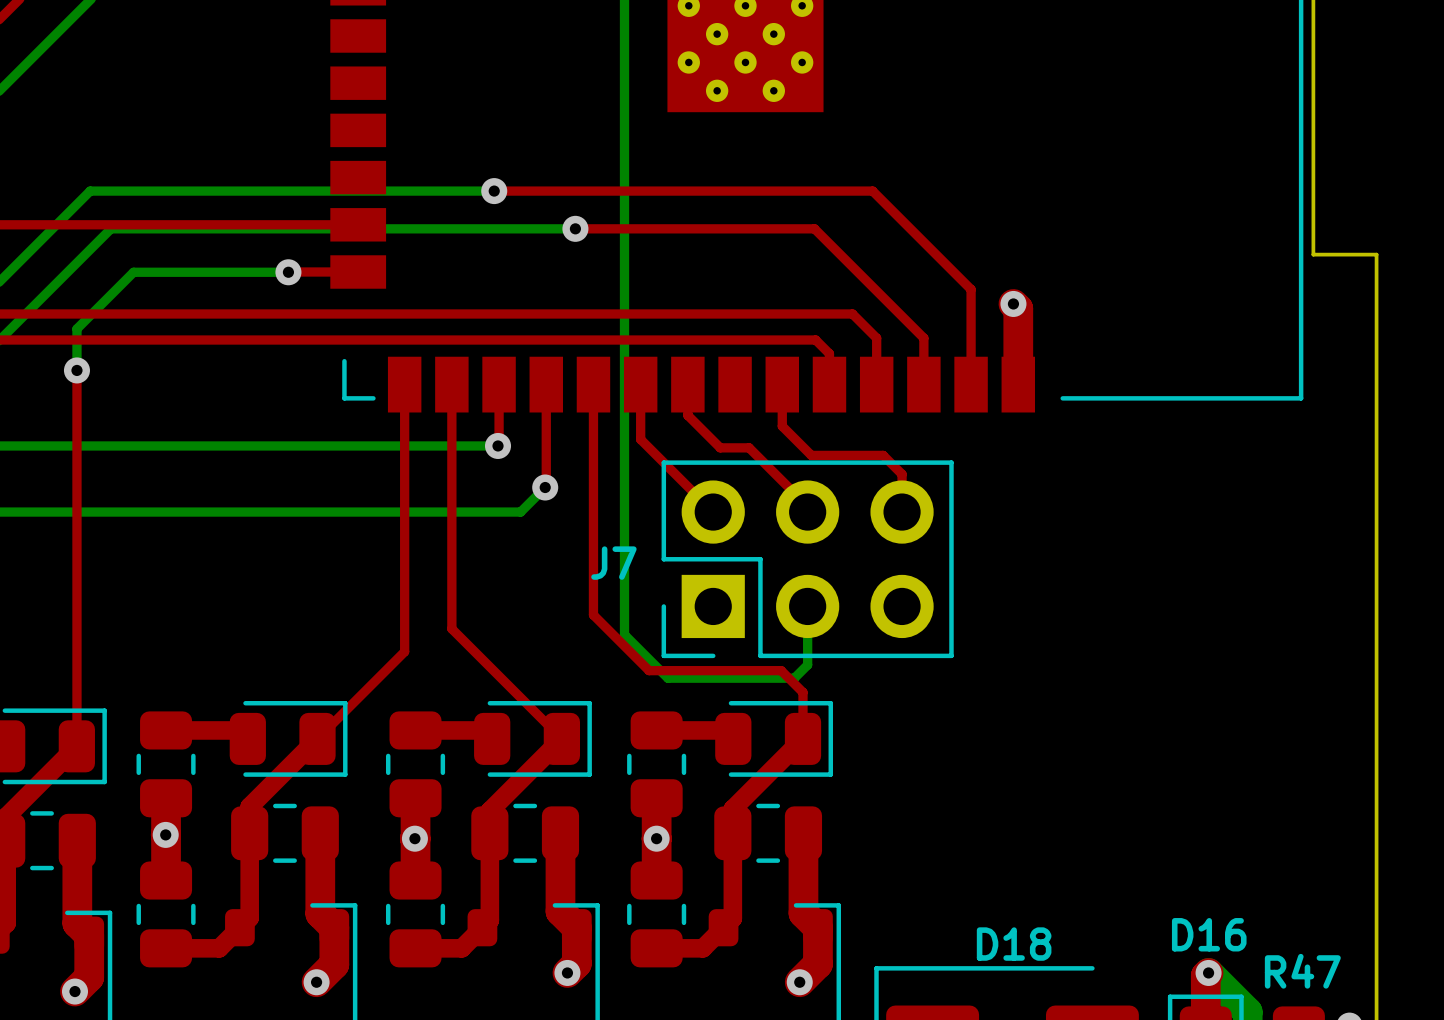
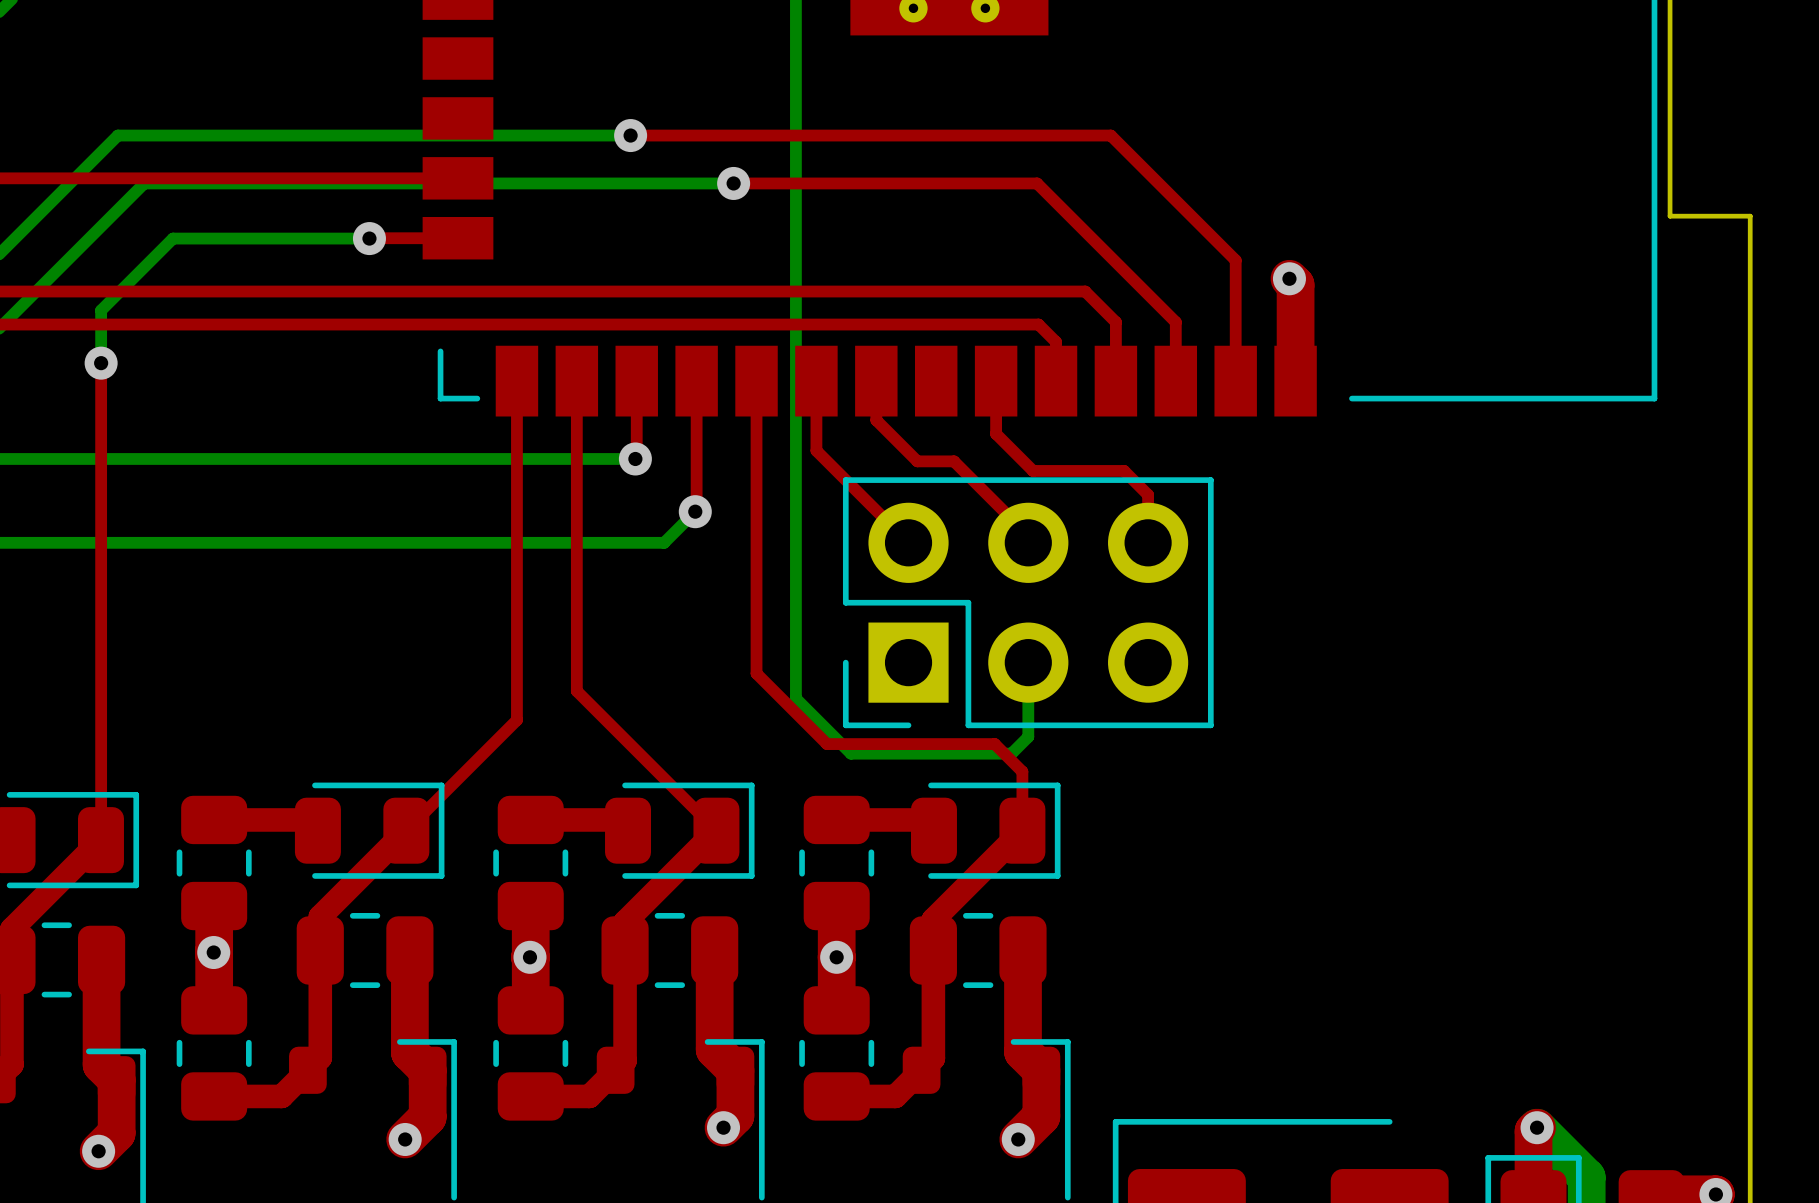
J7 name: J7 (613, 563) -> none
D16 name: D16 (1209, 934) -> none
D18 name: D18 (1014, 944) -> none
R47 name: R47 (1302, 971) -> none

